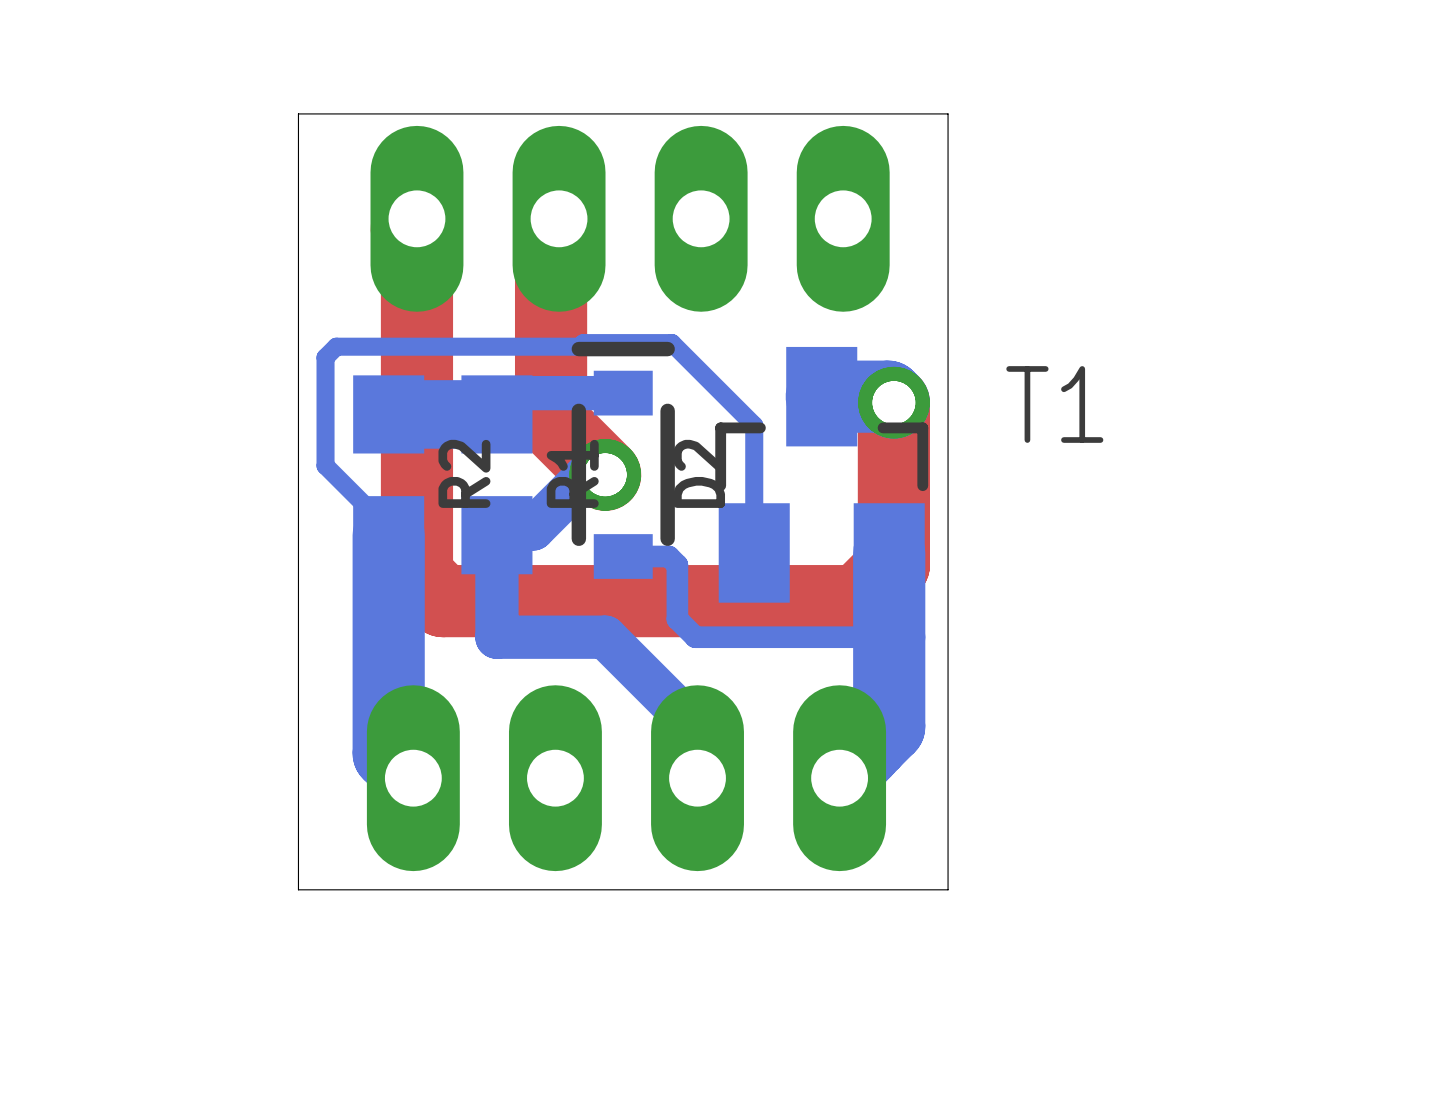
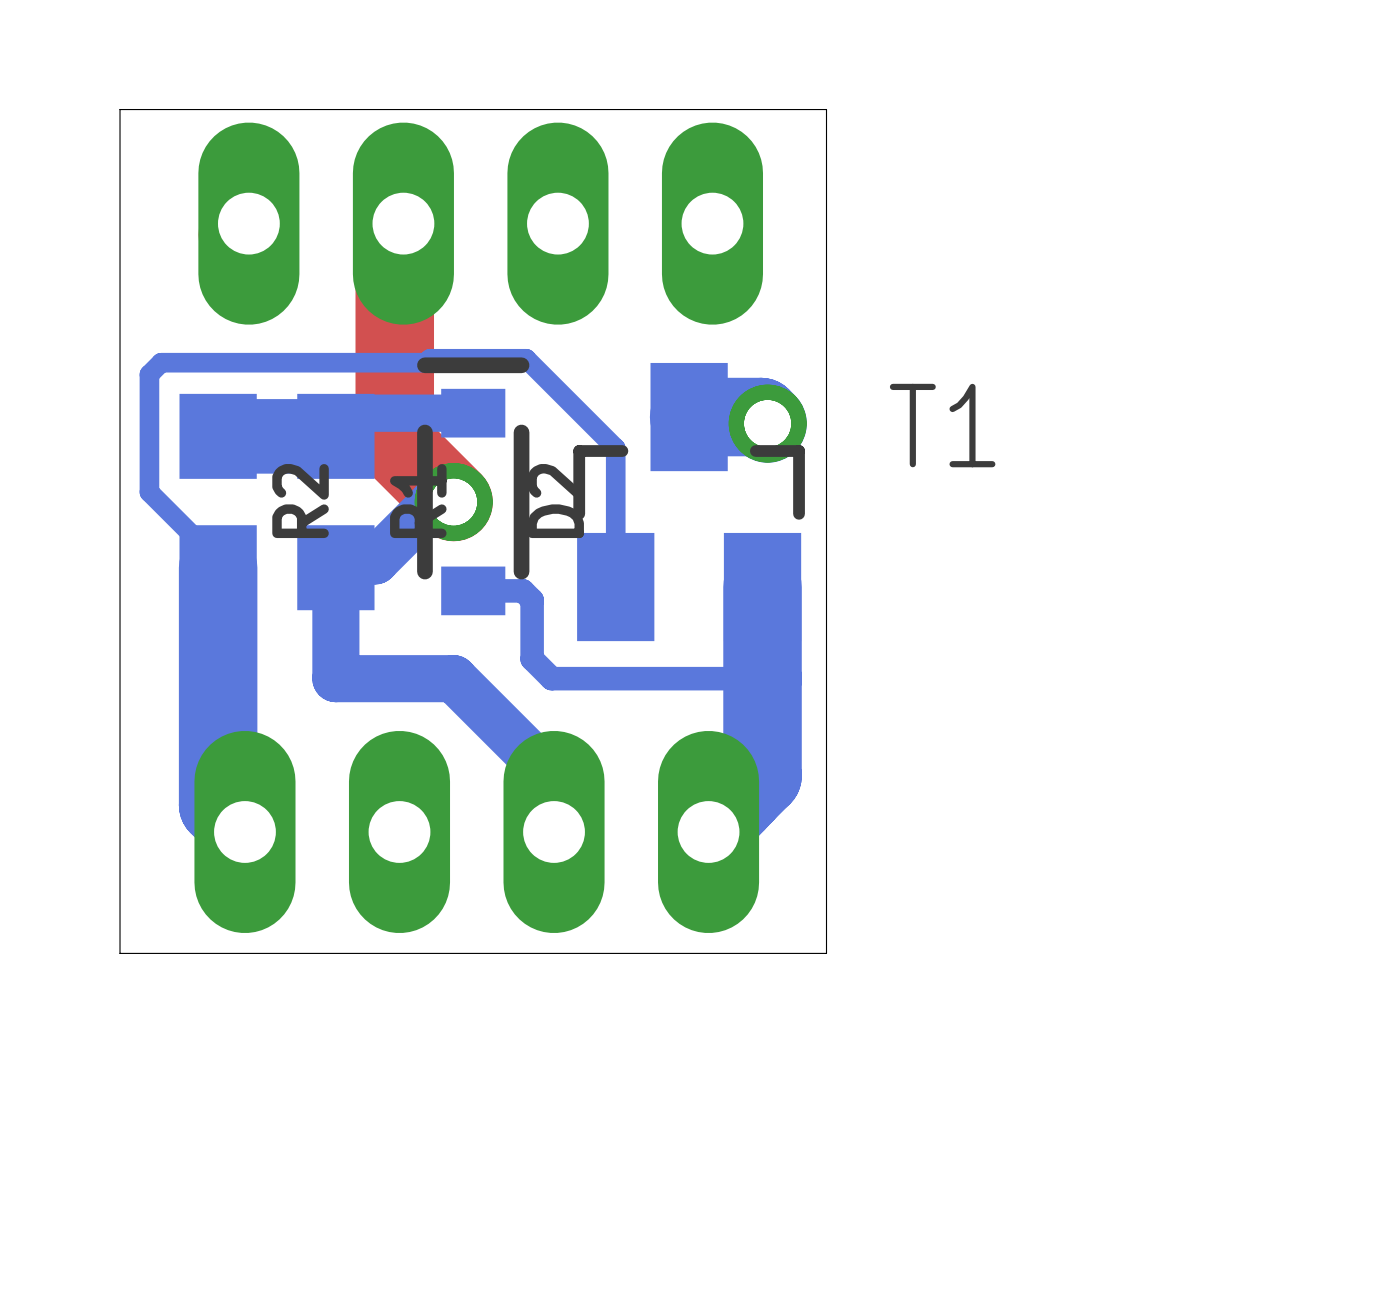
top track: (416, 218) (416, 575) (442, 601) (857, 601) (893, 565) (893, 402) -> none

